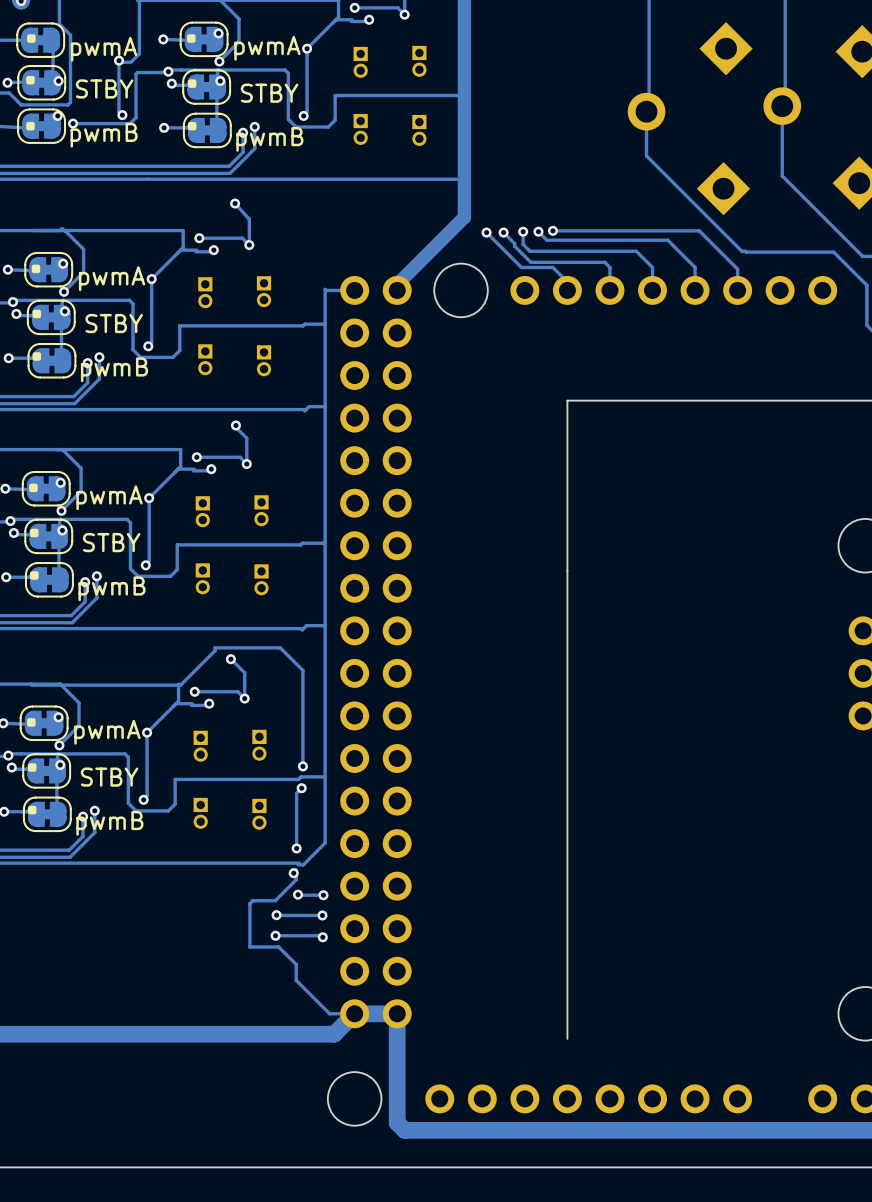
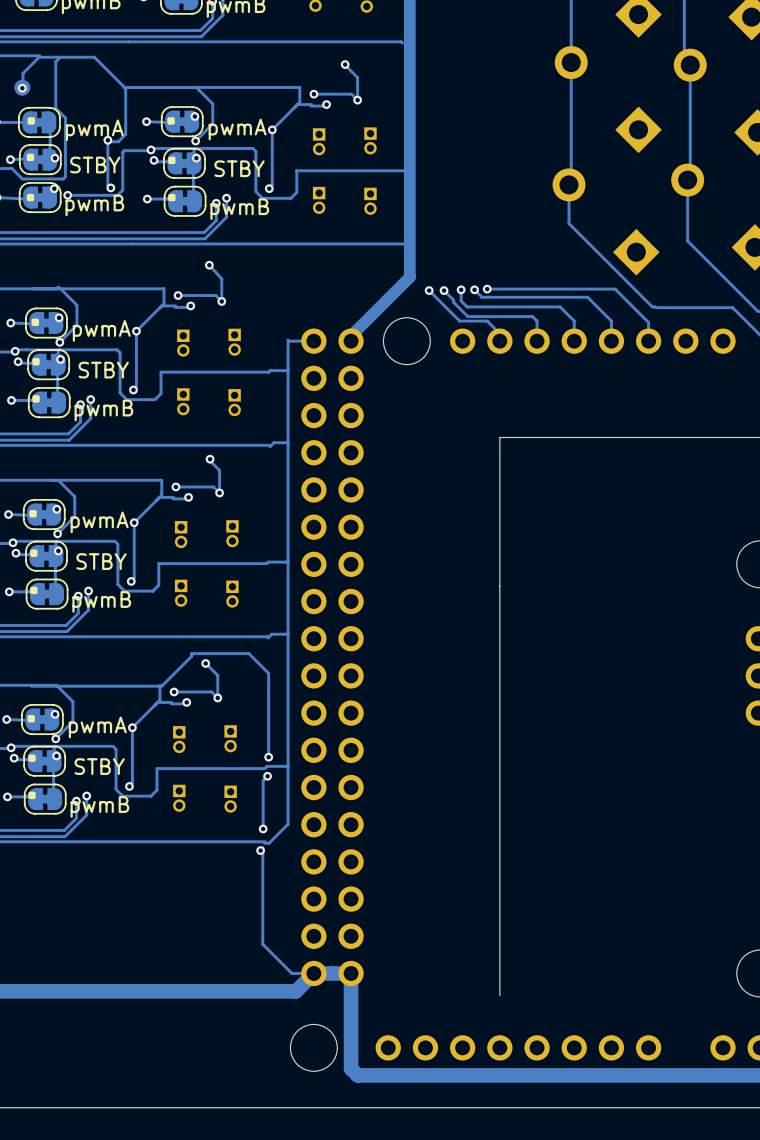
track: (296, 879) (275, 900) (252, 900) (249, 903) (249, 946) (278, 946) (296, 964) -> (262, 856) (262, 930)
track: (298, 894) (323, 895) -> none
via: (298, 894) -> none
via: (323, 895) -> none
track: (276, 915) (322, 915) -> none
via: (276, 915) -> none
via: (322, 915) -> none
track: (275, 935) (322, 937) -> none
via: (275, 935) -> none
via: (322, 937) -> none

